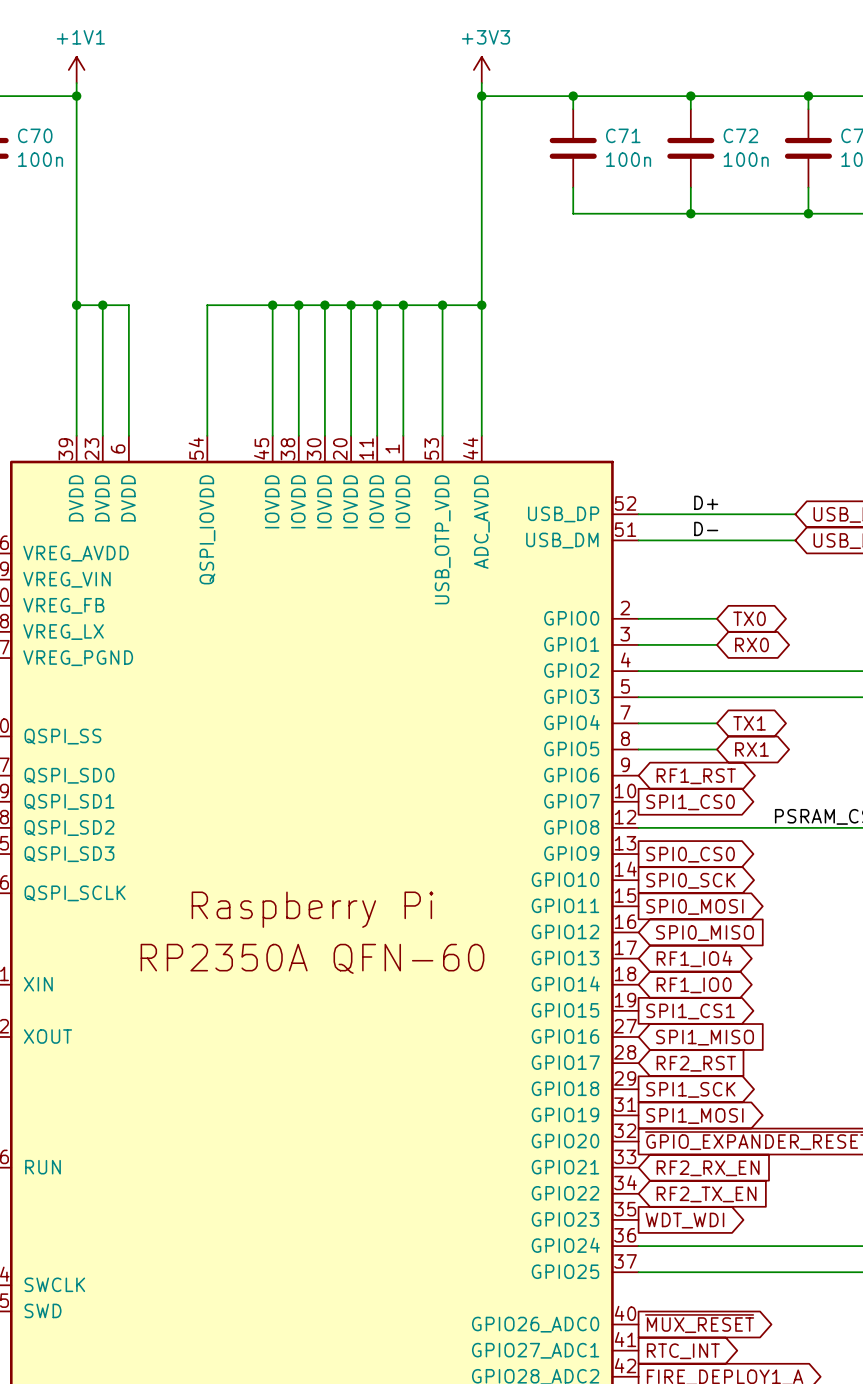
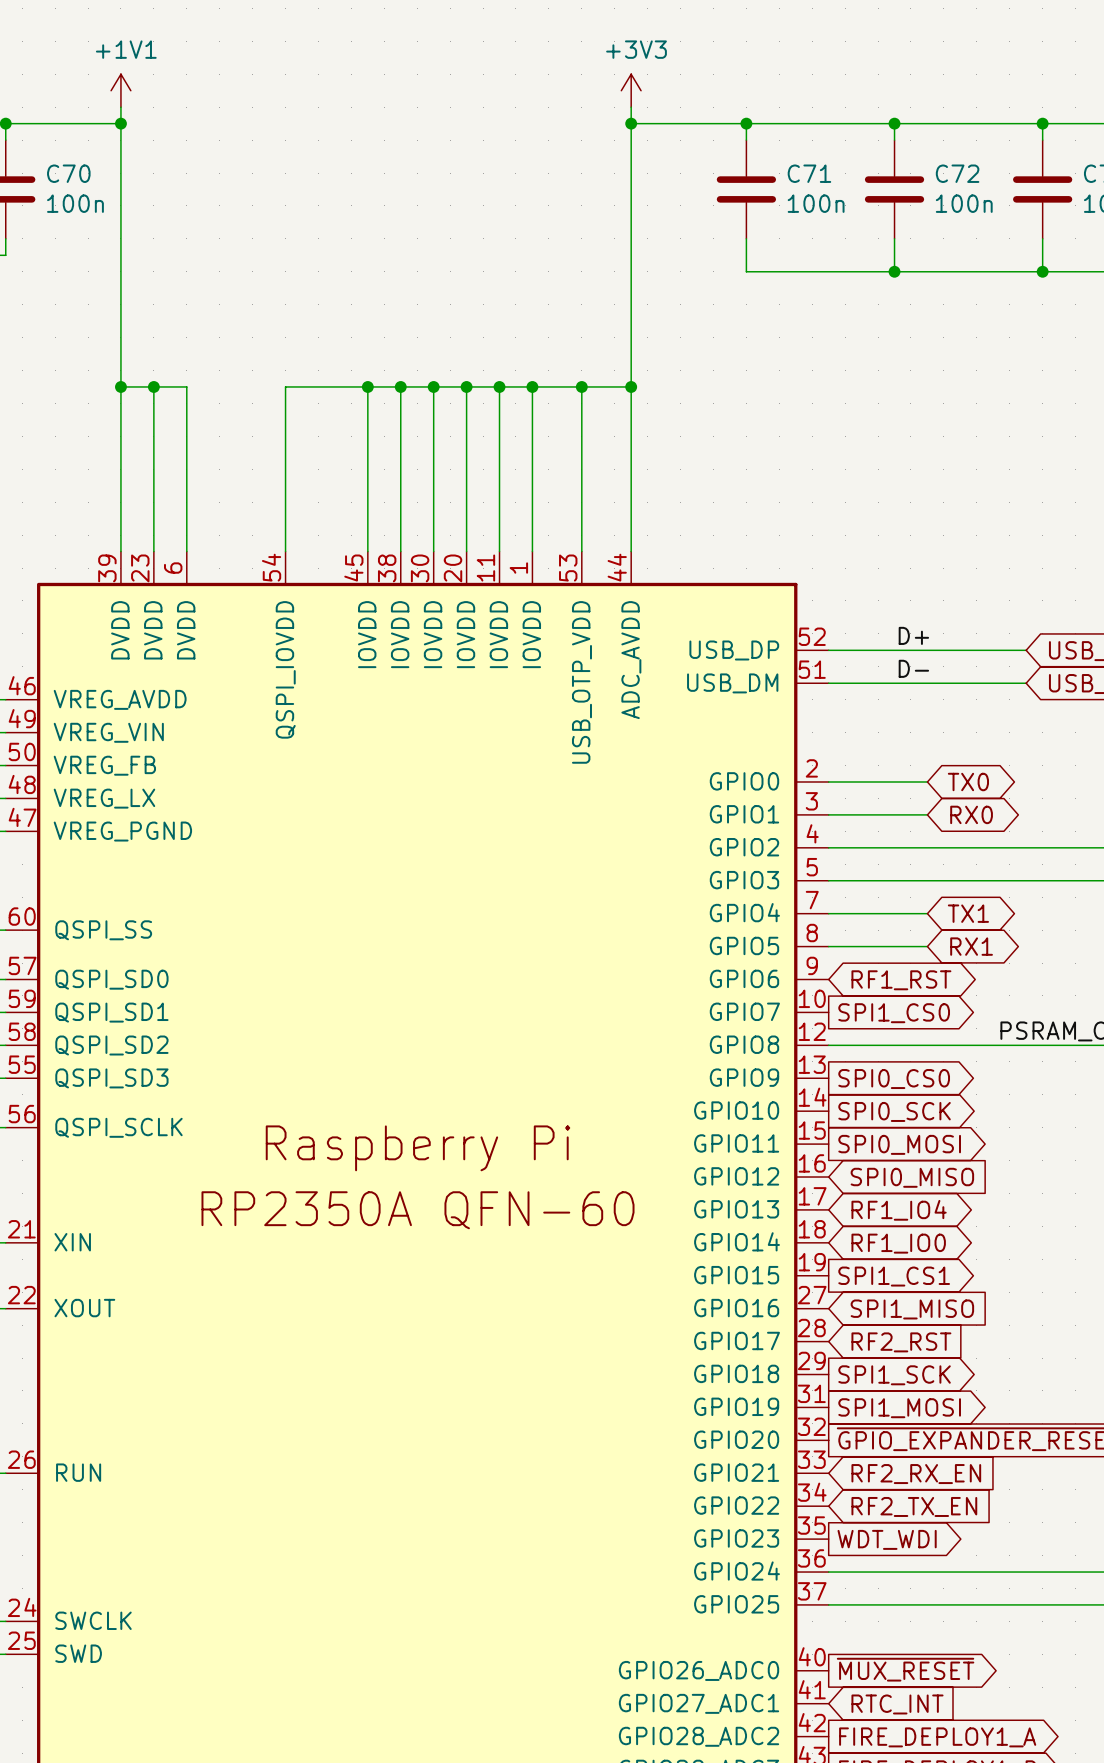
global label shape: output (683, 1351) -> input (897, 1704)

